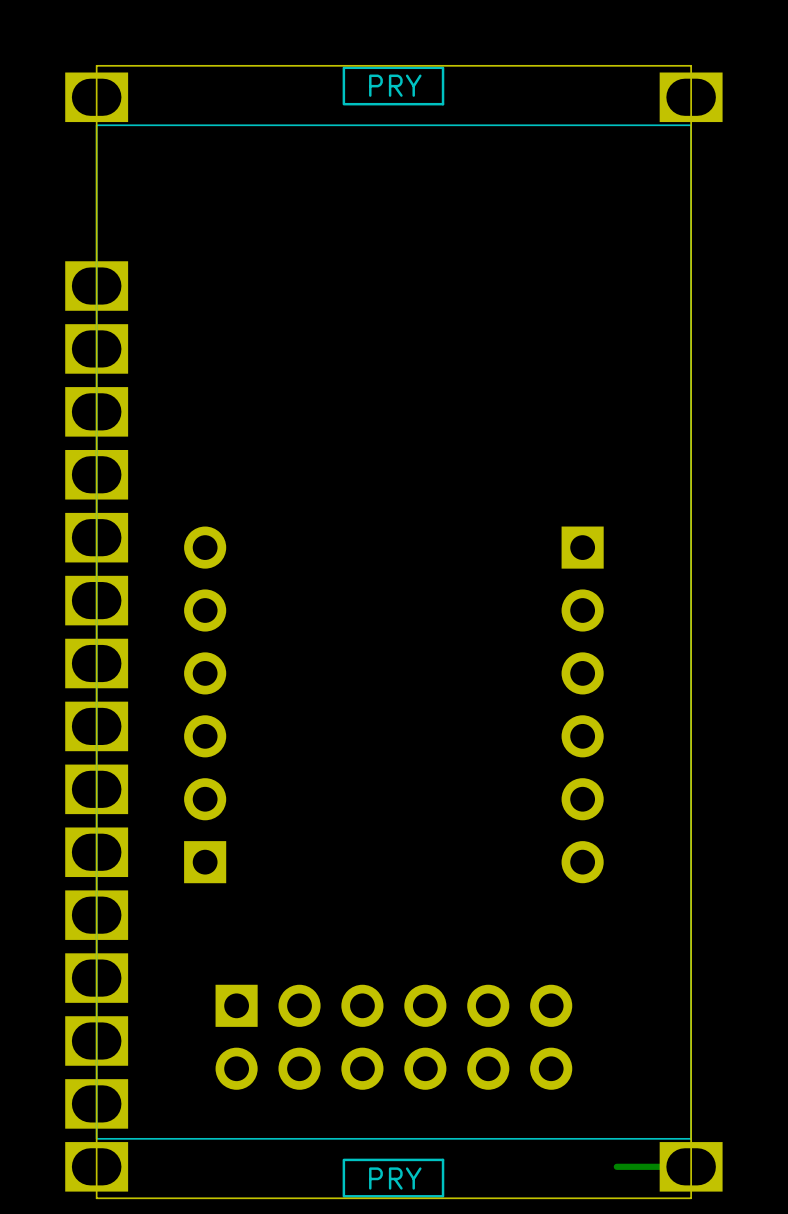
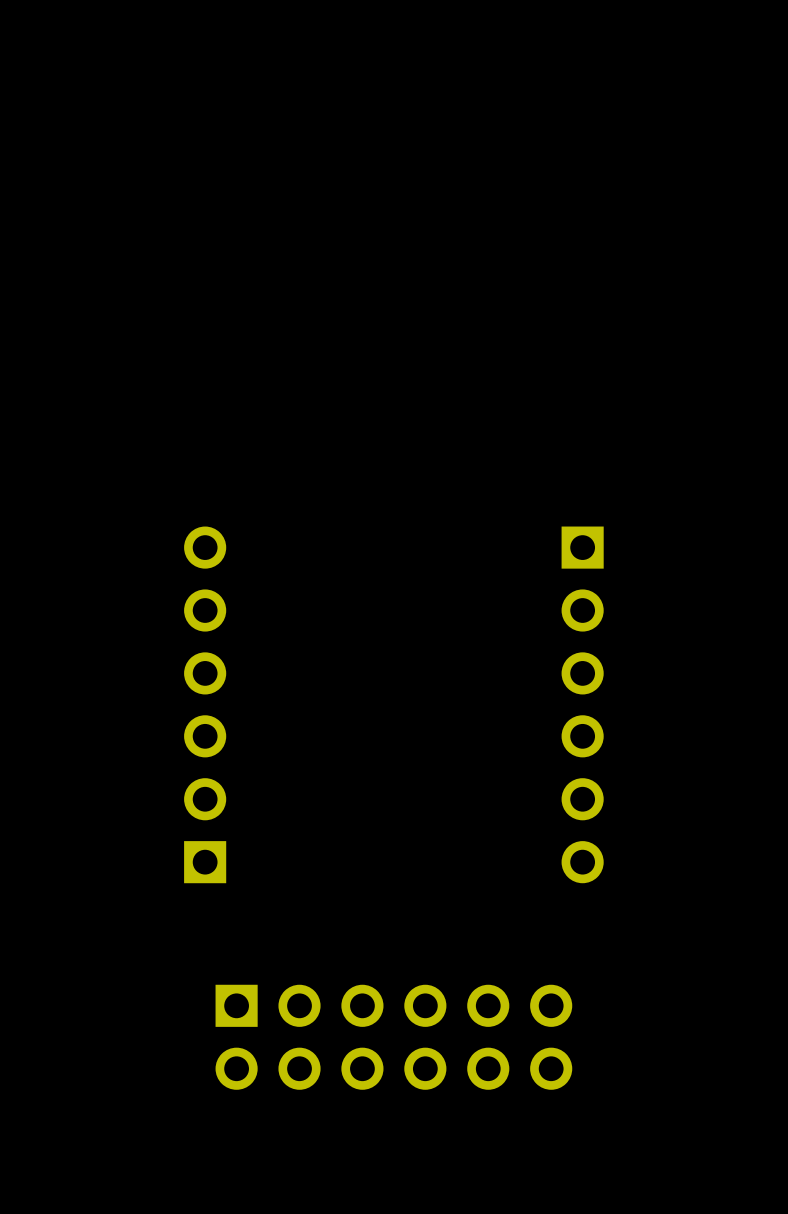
part: (393, 632) -> none
track: (691, 1166) (616, 1166) -> none

